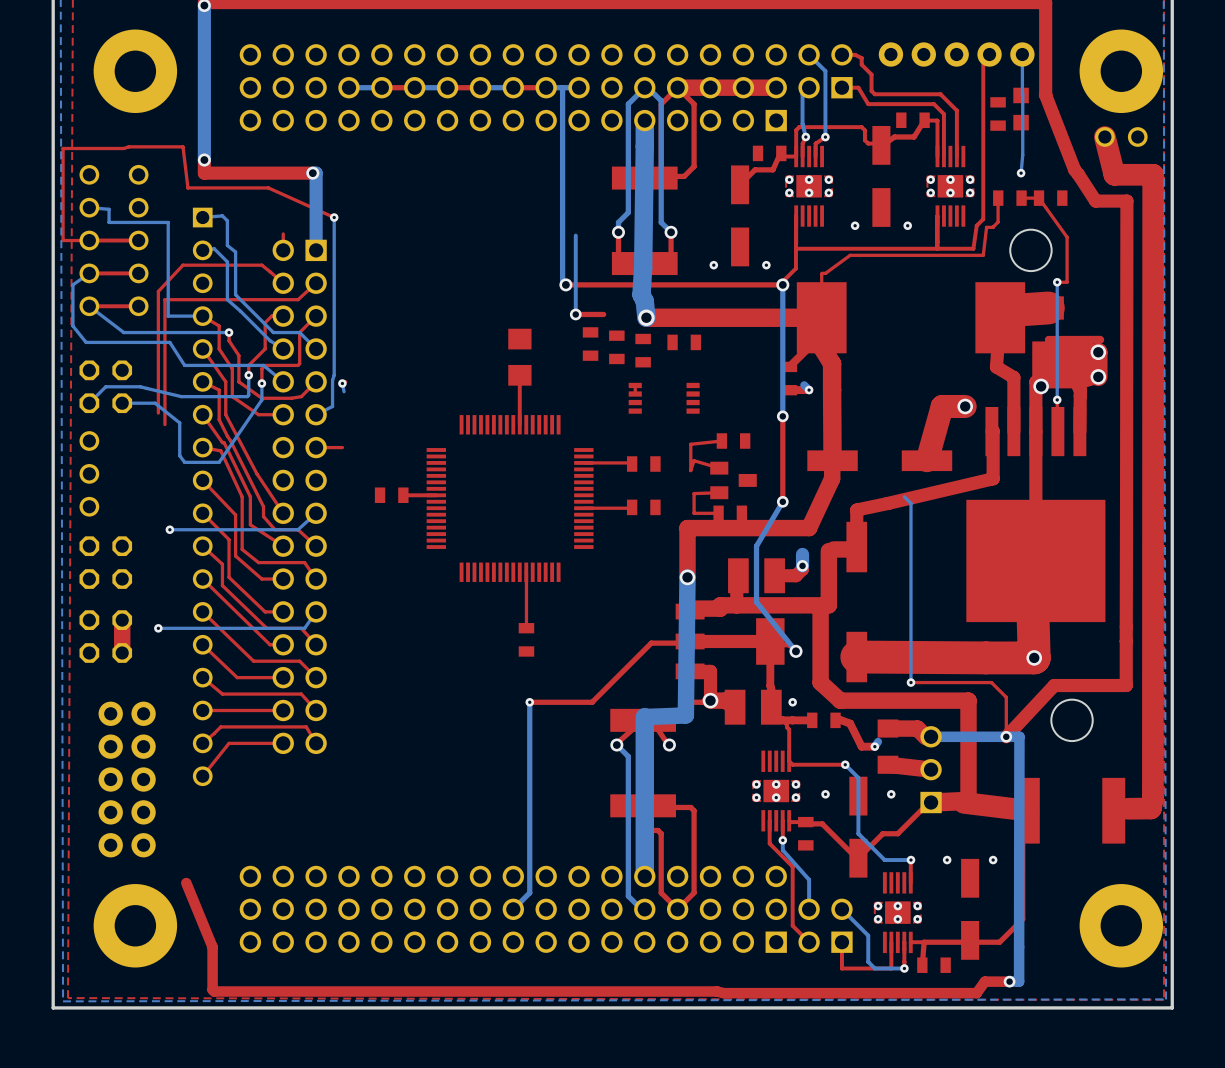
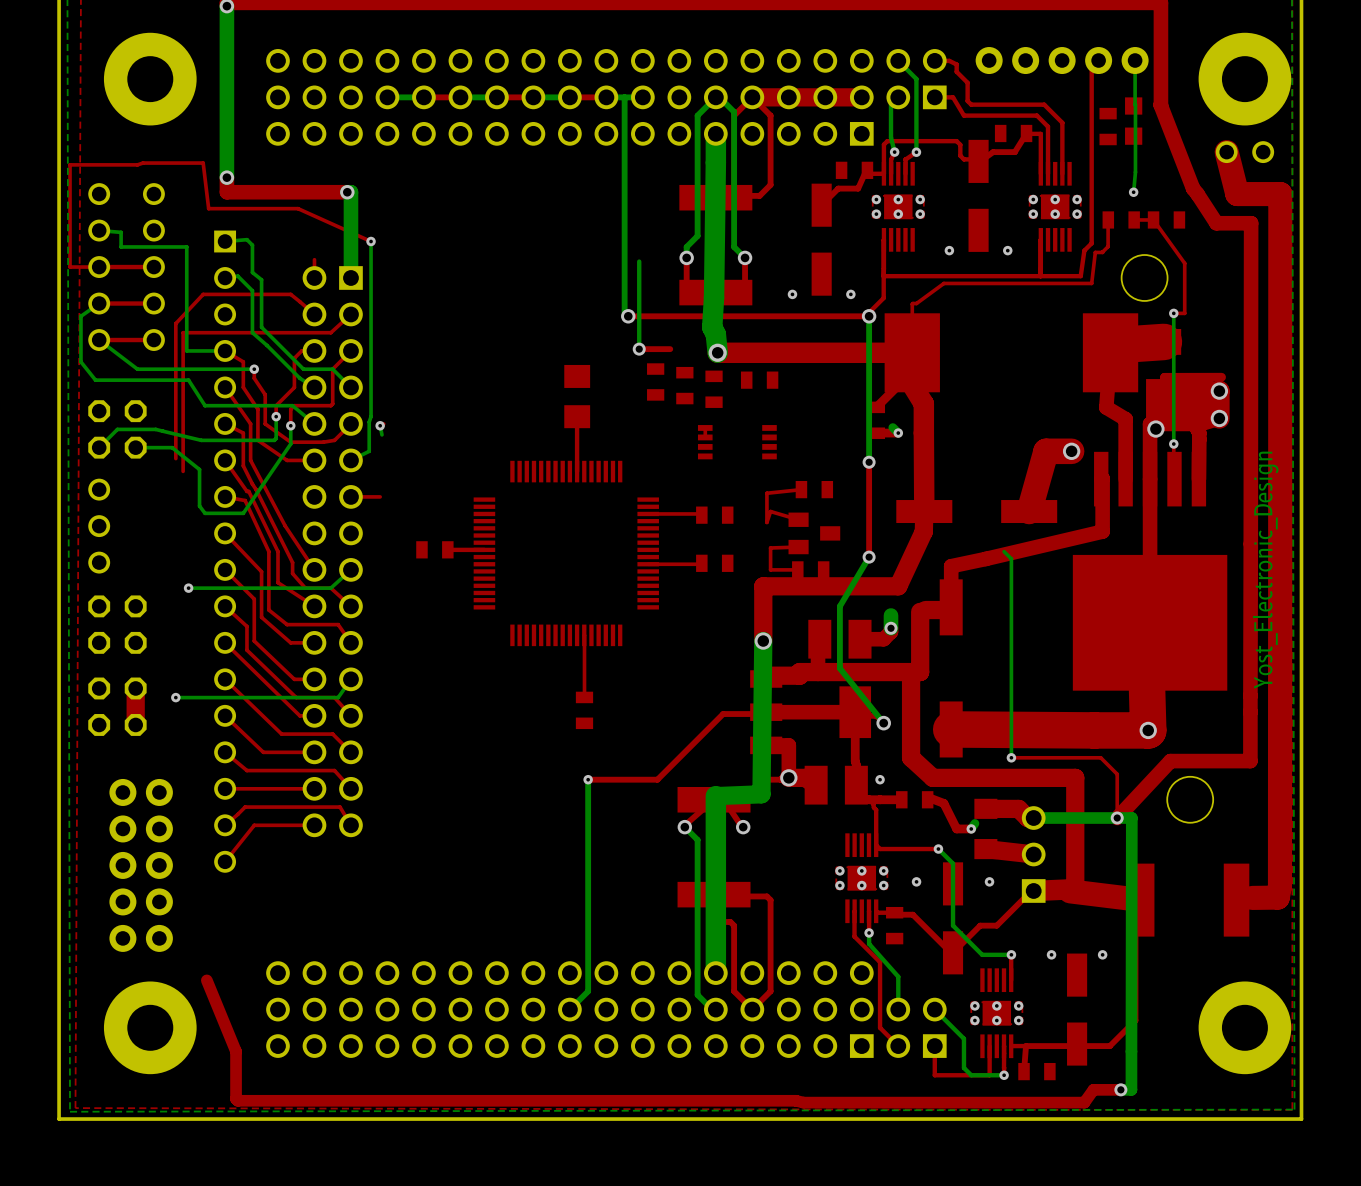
text: none -> Yost_Electronic_Design (1265, 570)

